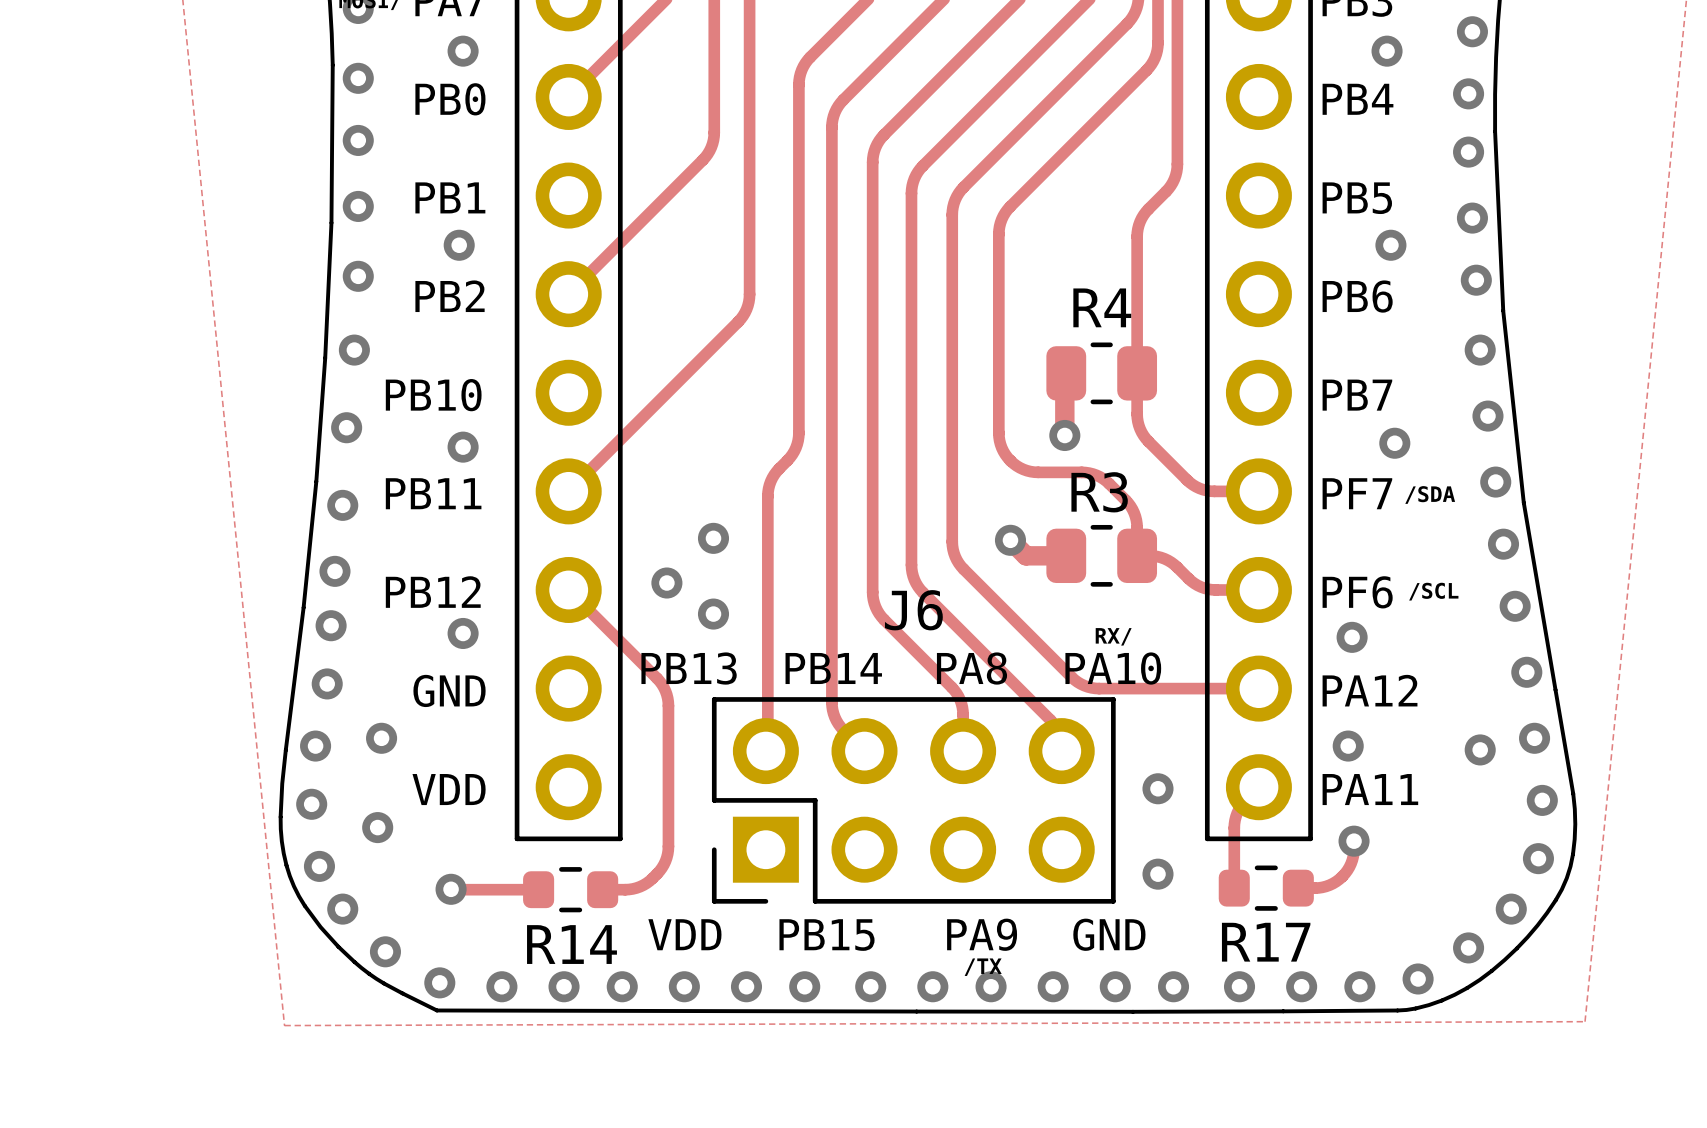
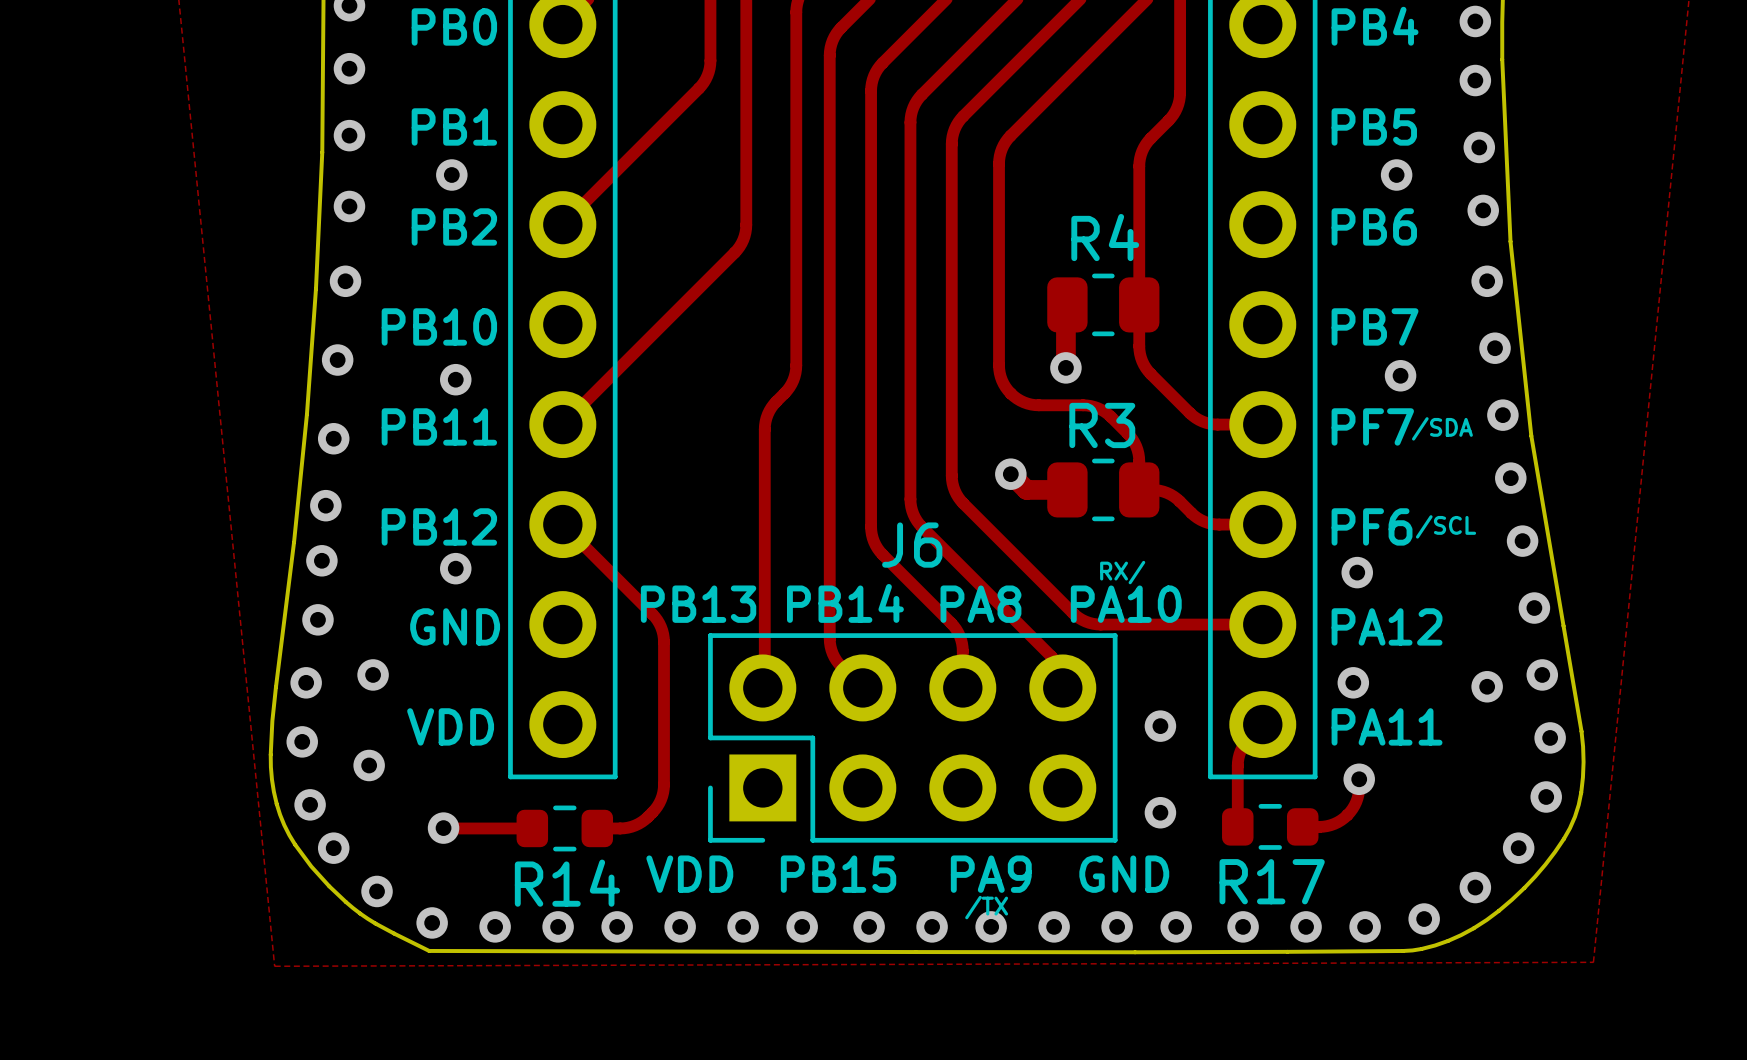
via: (713, 538) -> none
via: (666, 583) -> none
via: (713, 614) -> none

